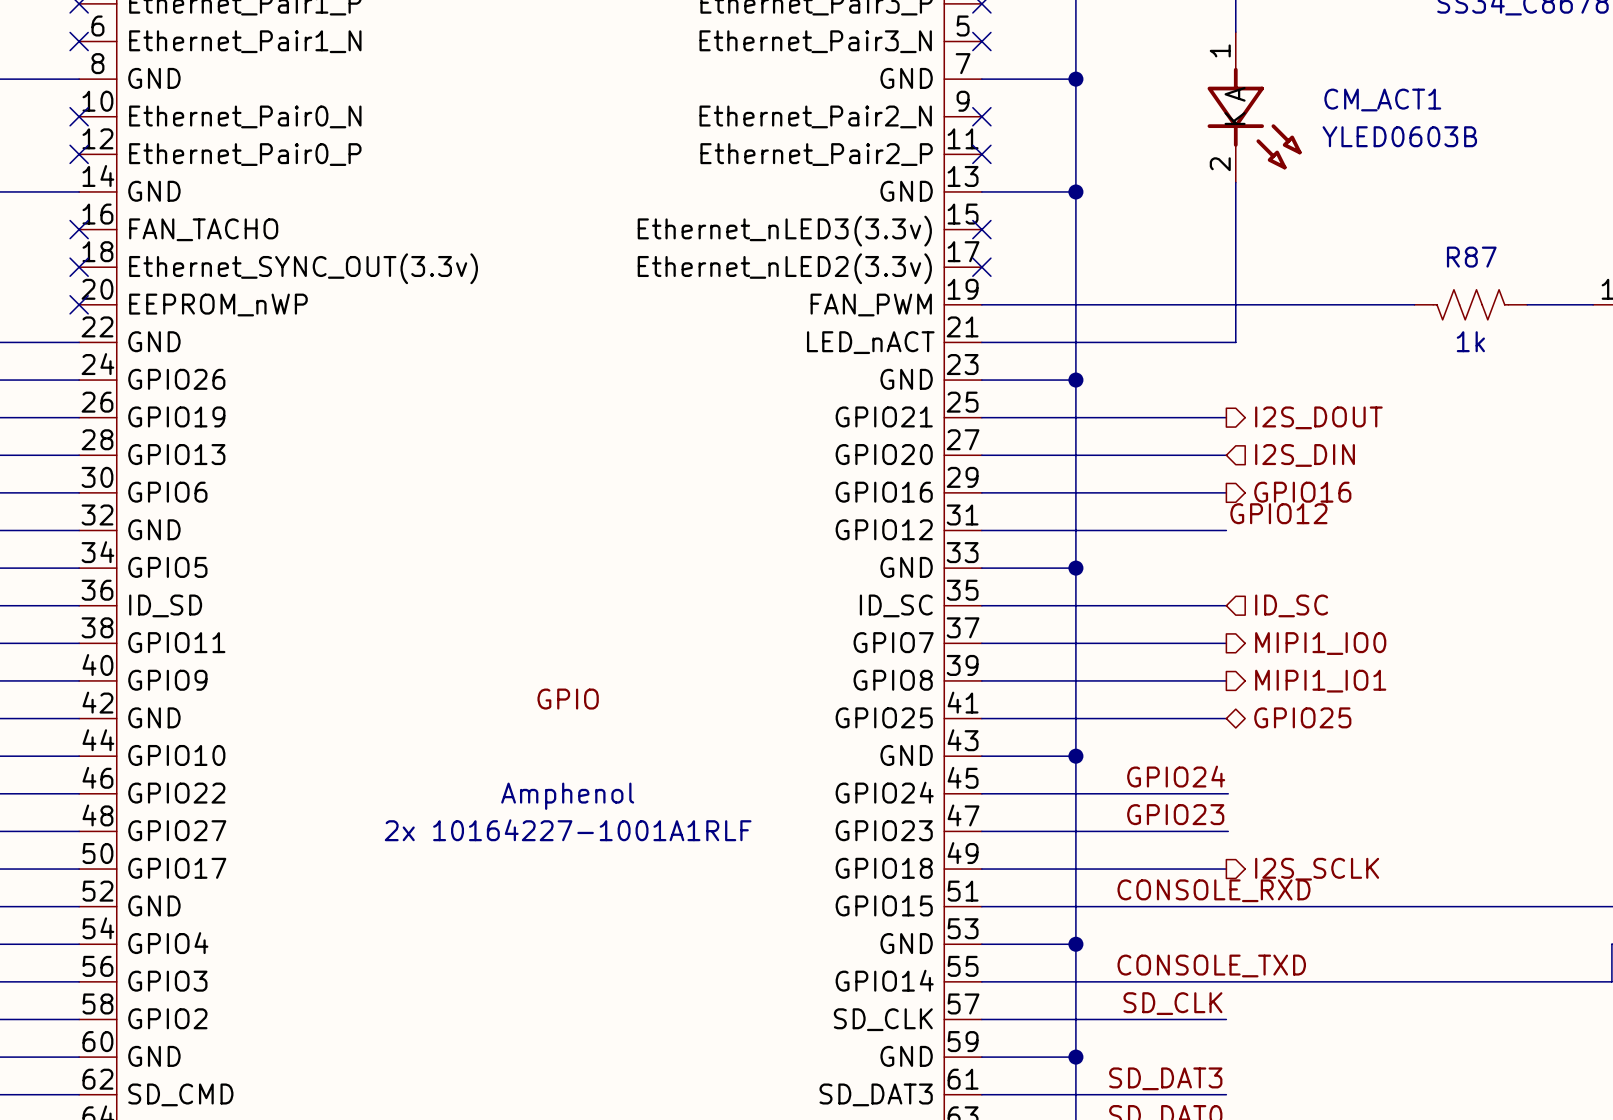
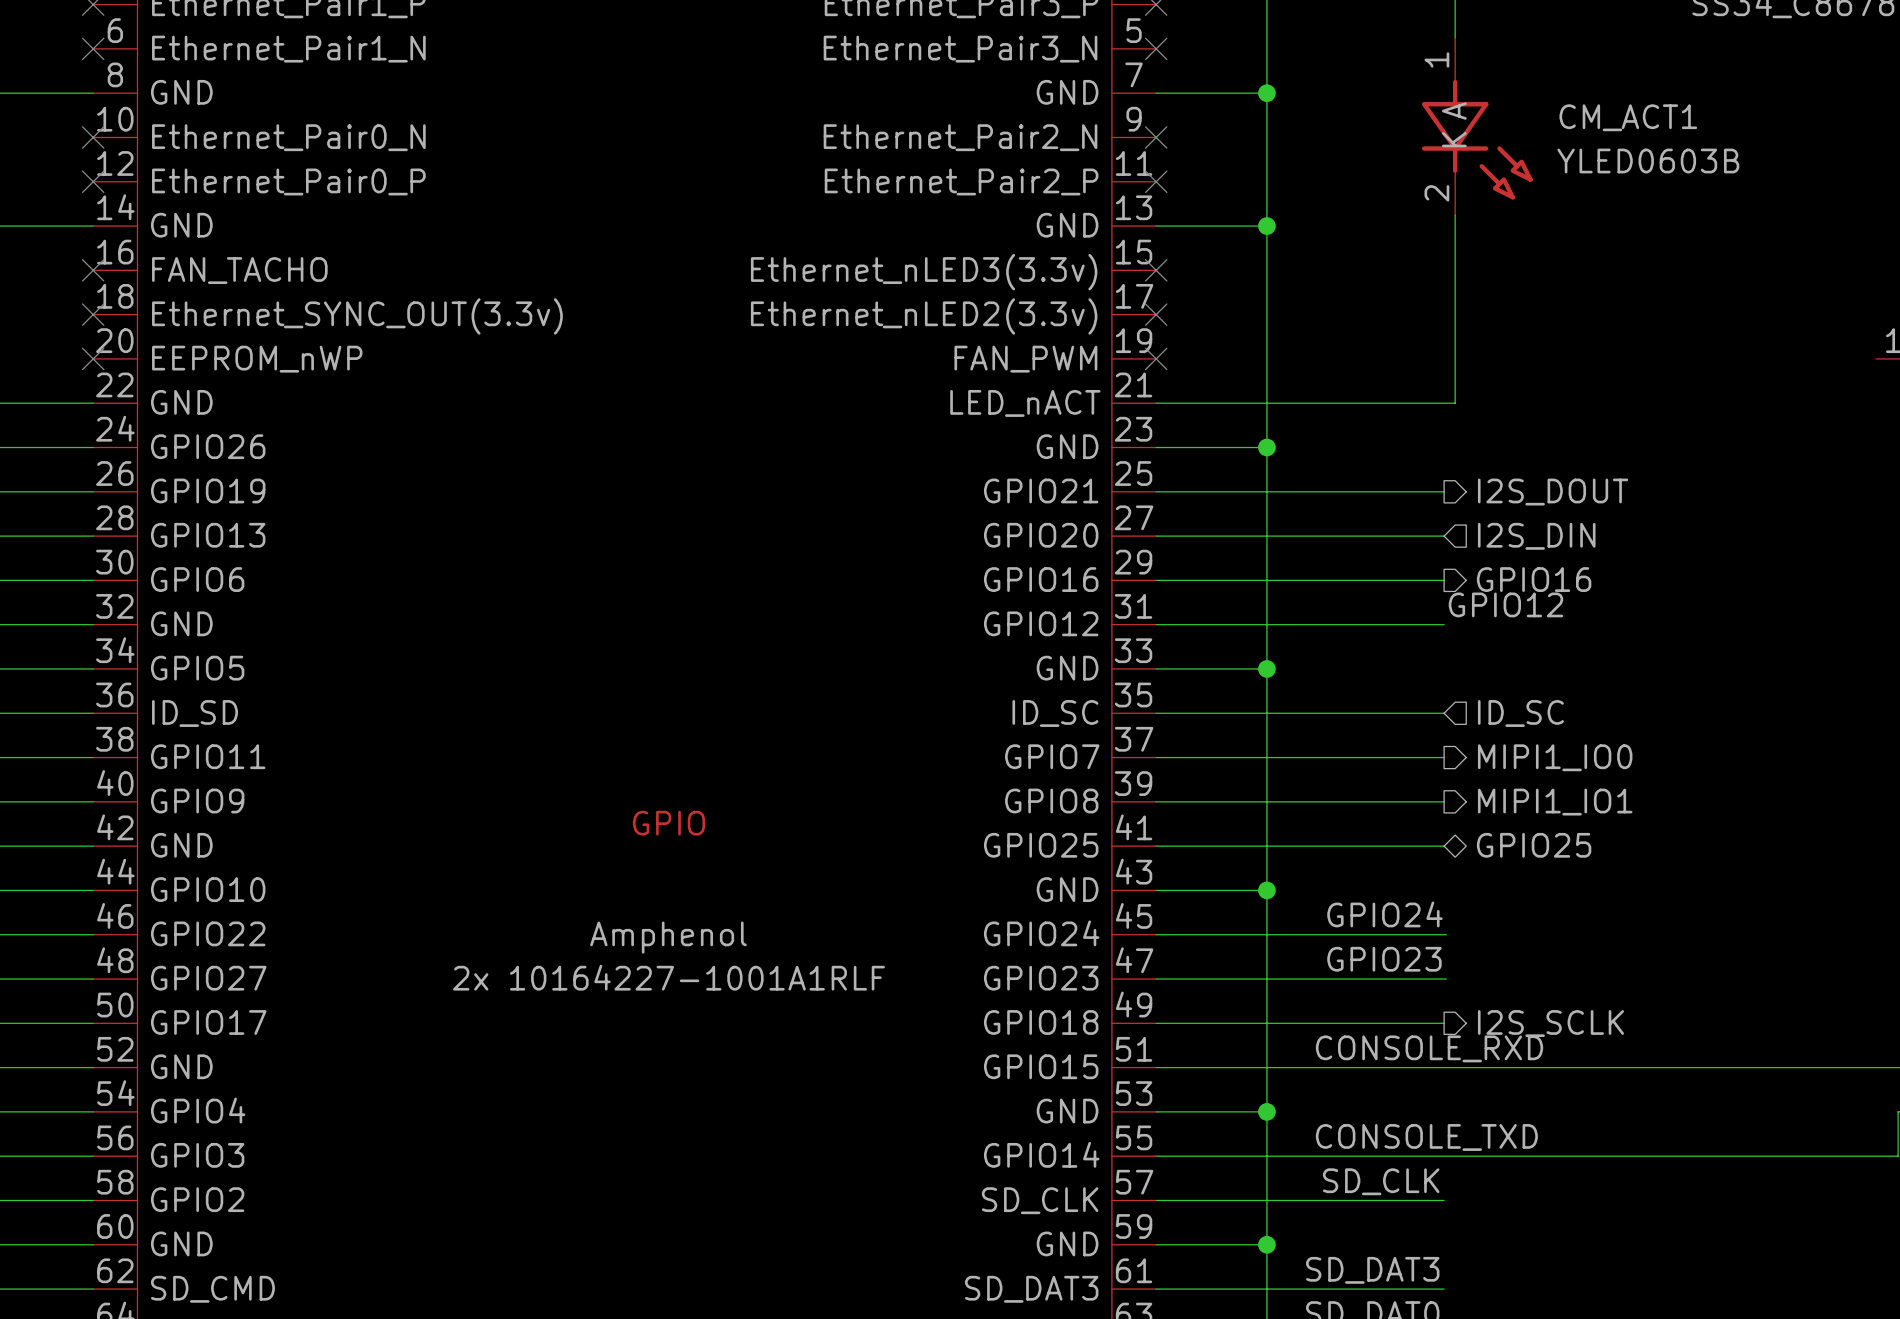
wire: (981, 304) (1414, 304) -> none
no-connect mark: none -> (1156, 358)
R87: 1k (1470, 304) -> none
wire: (1527, 304) (1593, 304) -> none

